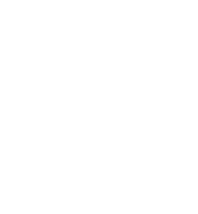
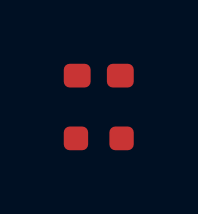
part: none -> (98, 75)
part: none -> (98, 138)

